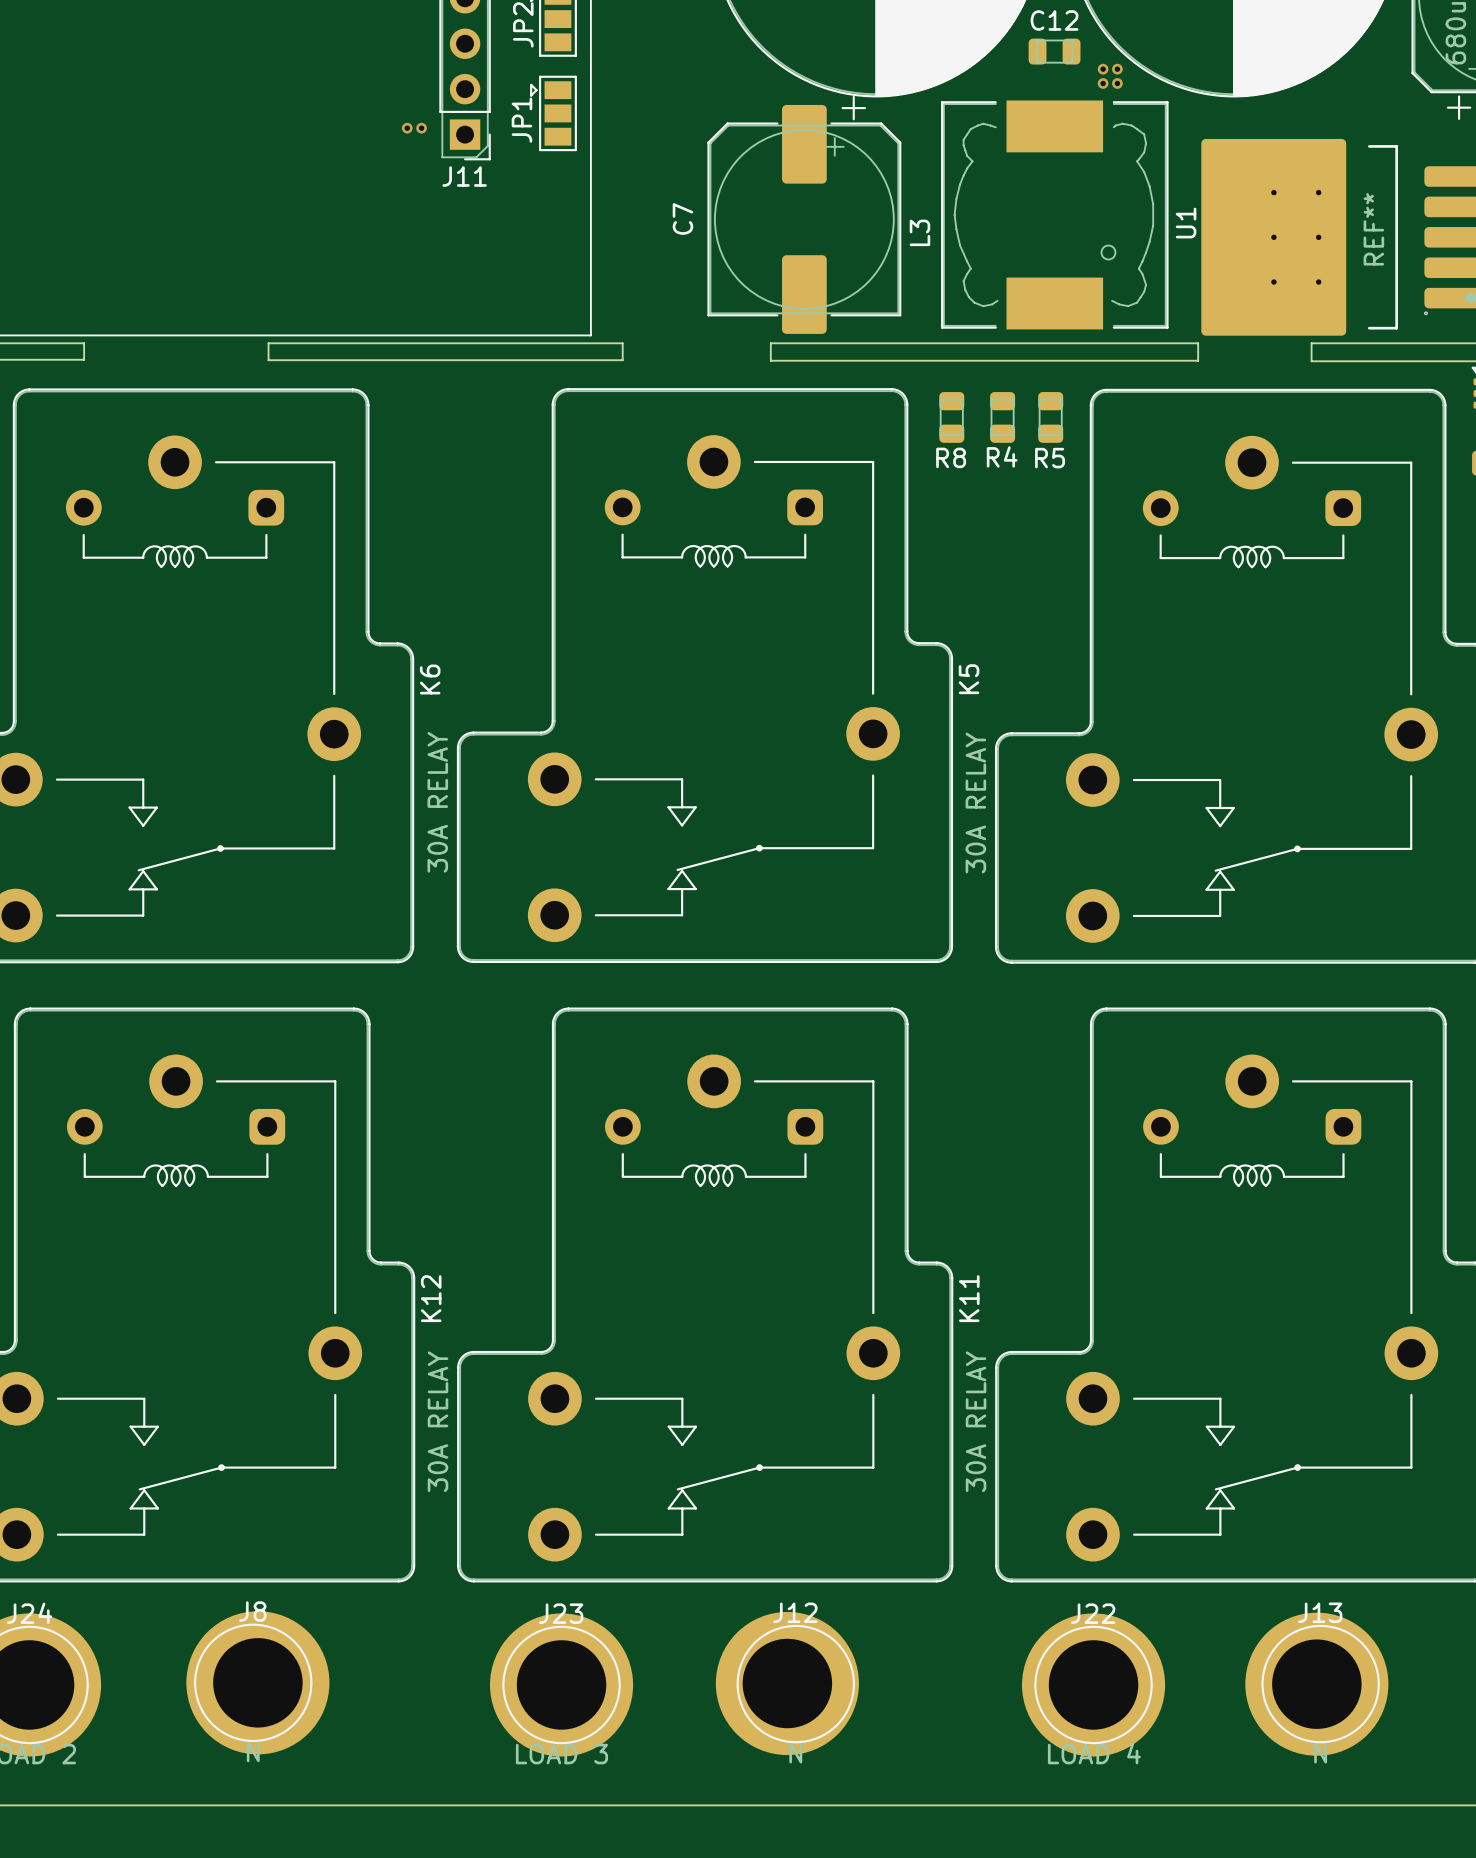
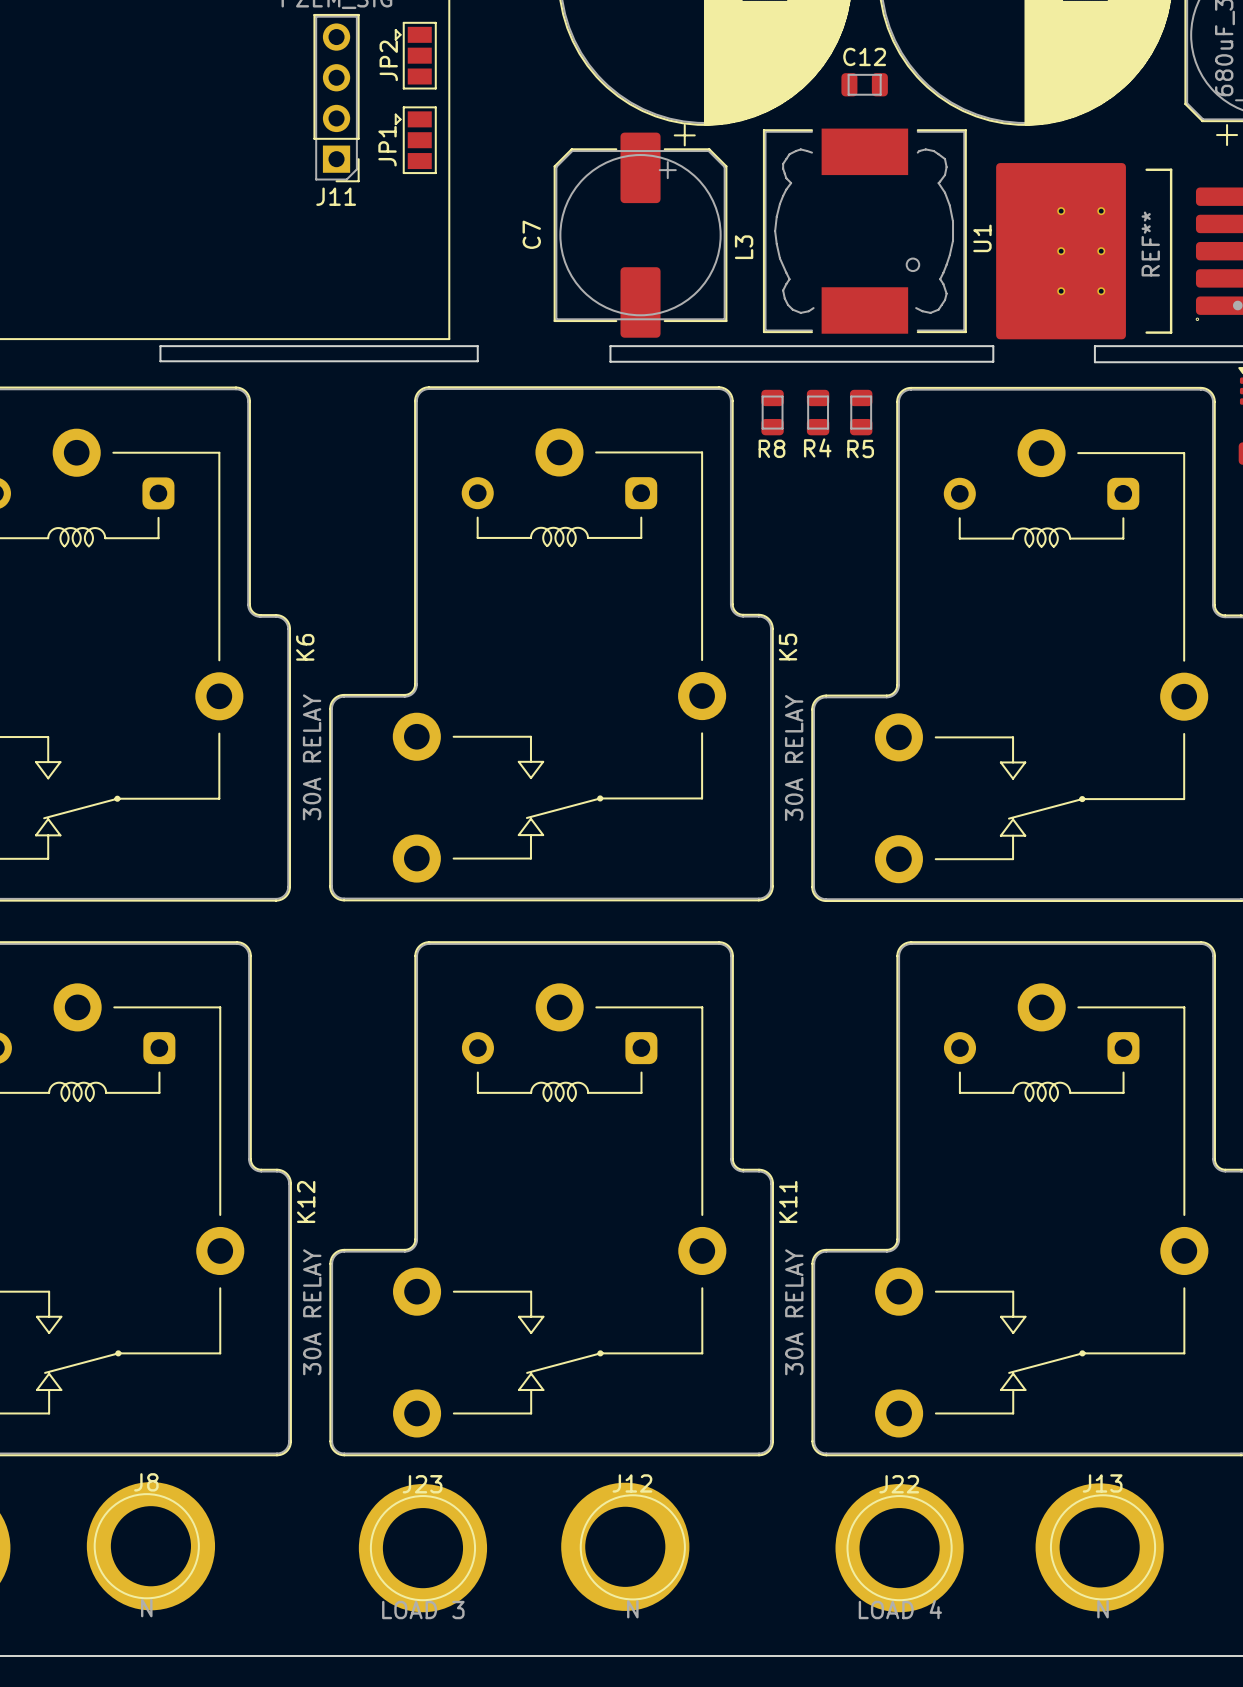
via: (1103, 69) -> none
via: (1117, 69) -> none
via: (1103, 83) -> none
via: (1117, 83) -> none
via: (407, 128) -> none
via: (421, 128) -> none

